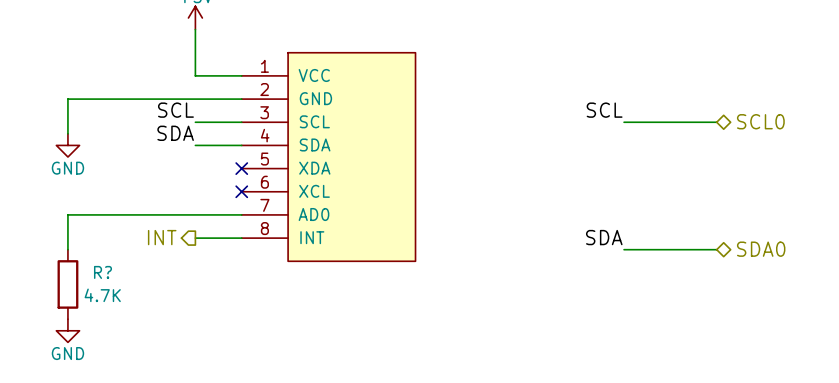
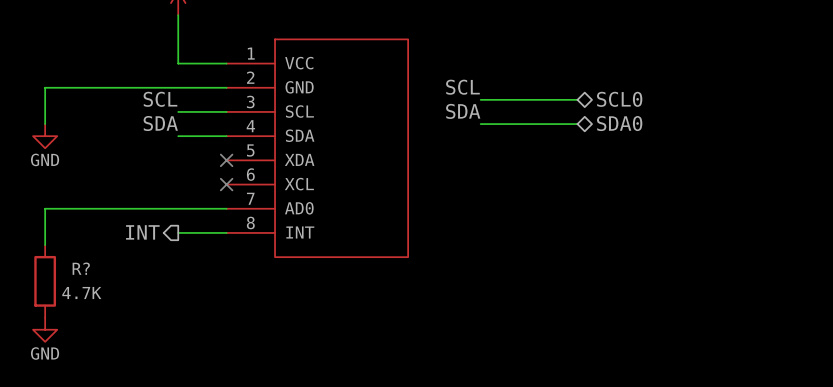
label position: SCL (604, 110) -> SCL (462, 87)
hierarchical label position: SCL0 (760, 121) -> SCL0 (619, 99)
wire: (624, 122) (716, 122) -> (480, 99) (577, 99)
label position: SDA (604, 237) -> SDA (463, 111)
wire: (624, 249) (716, 249) -> (480, 124) (577, 124)
hierarchical label position: SDA0 (761, 249) -> SDA0 (619, 123)

